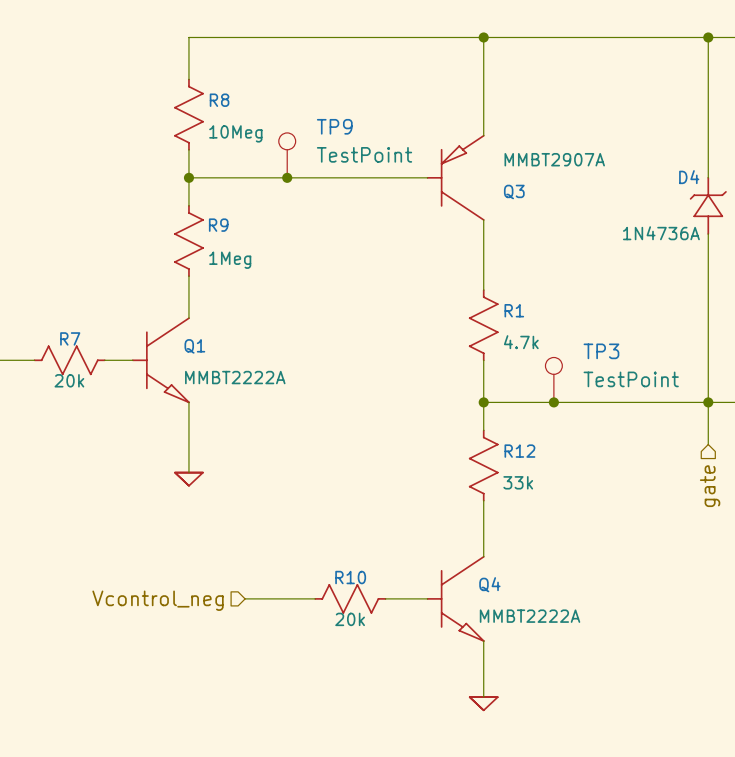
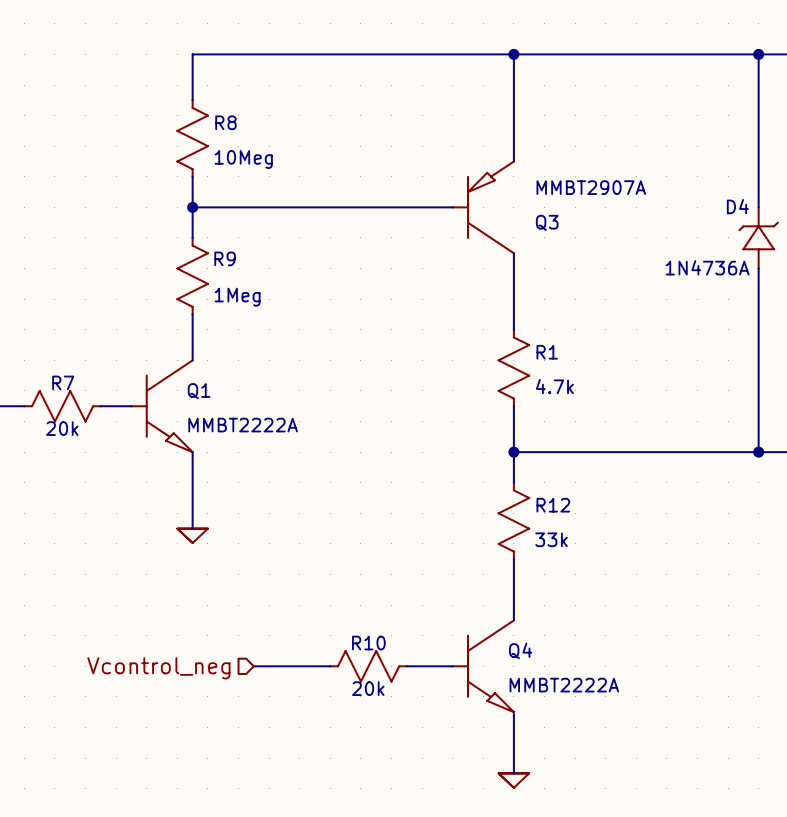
TP9: TestPoint (287, 155) -> none
junction: (287, 177) -> none
TP3: TestPoint (553, 379) -> none
junction: (553, 402) -> none
wire: (708, 402) (708, 444) -> none
hierarchical label: gate (710, 486) -> none

